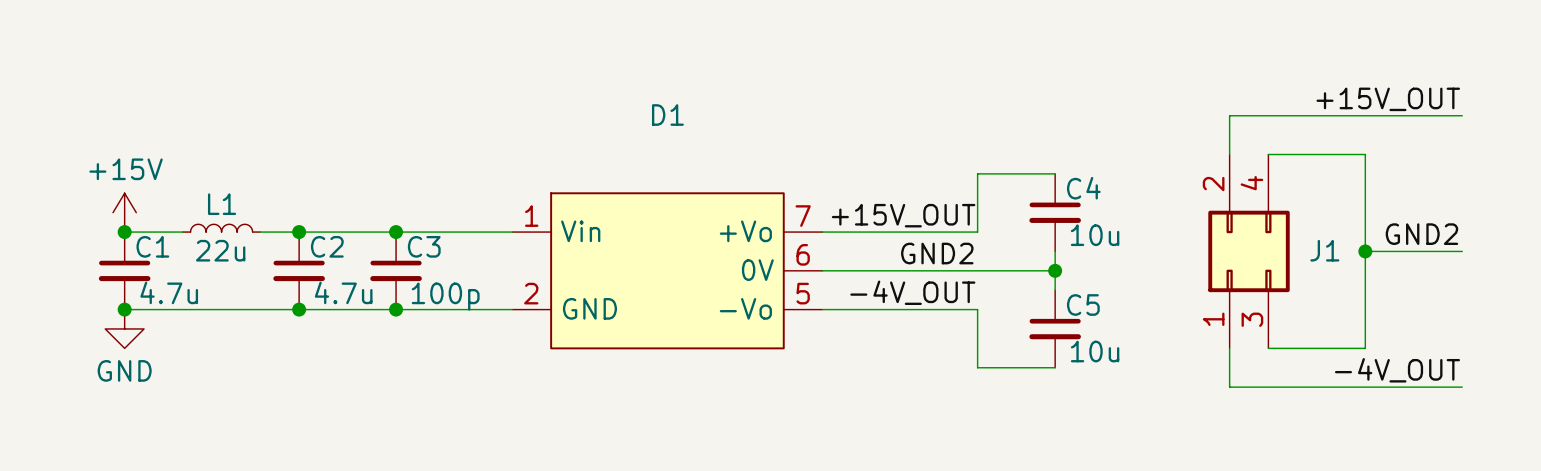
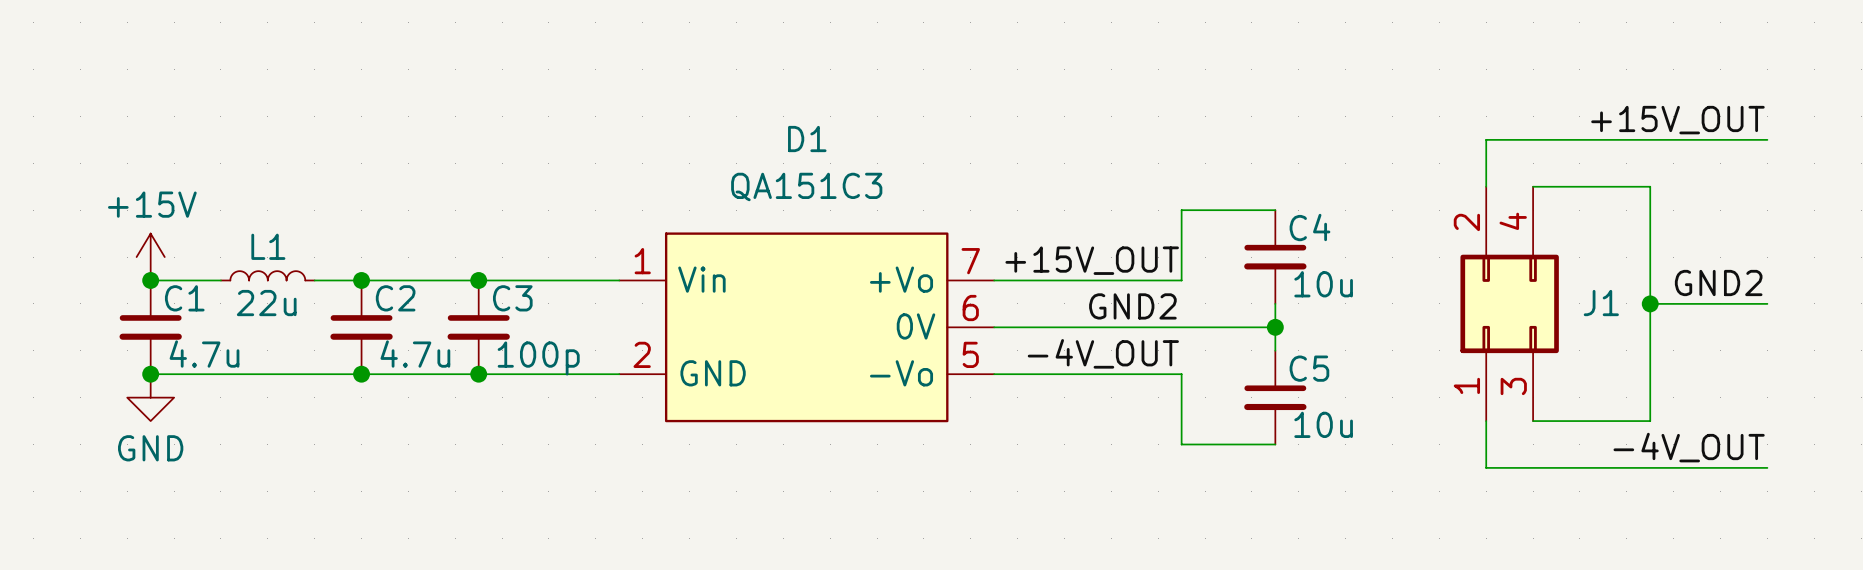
D1 value: none -> QA151C3 (806, 186)

